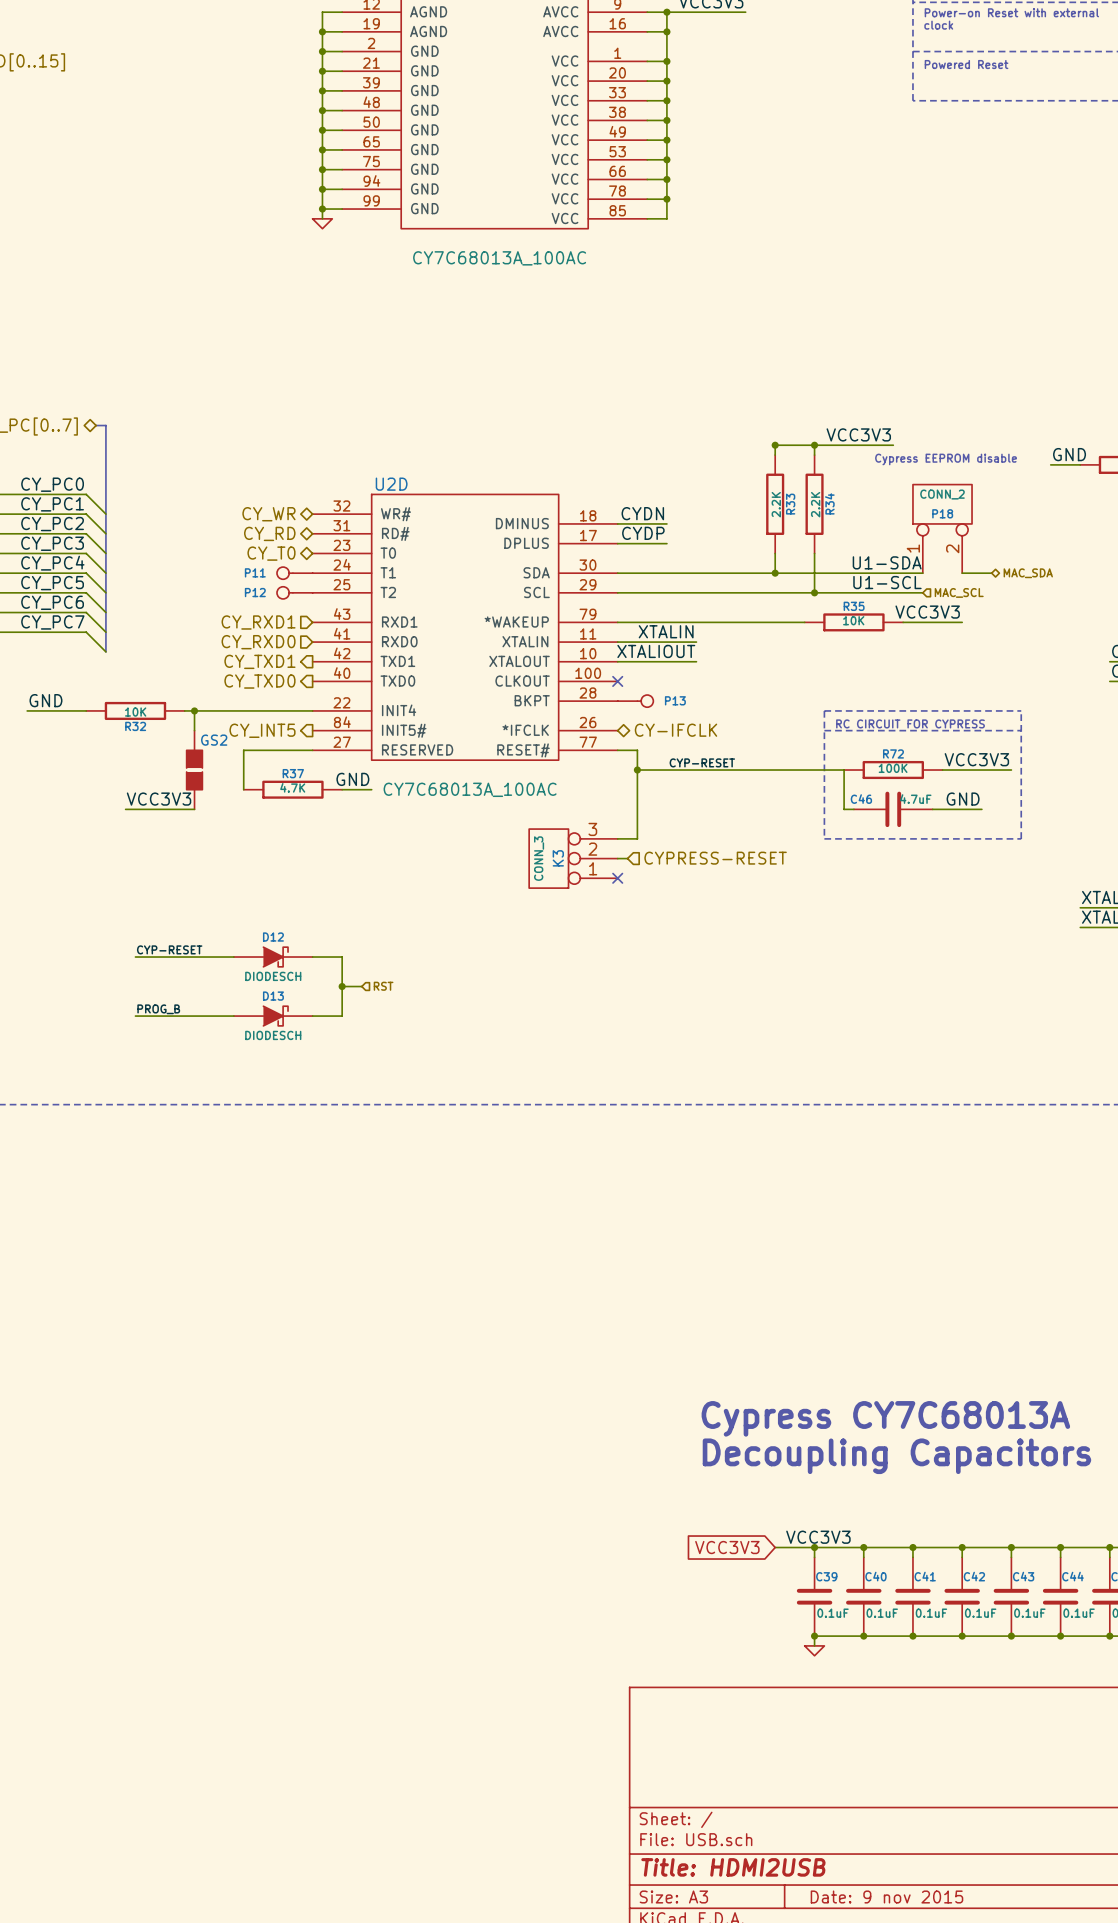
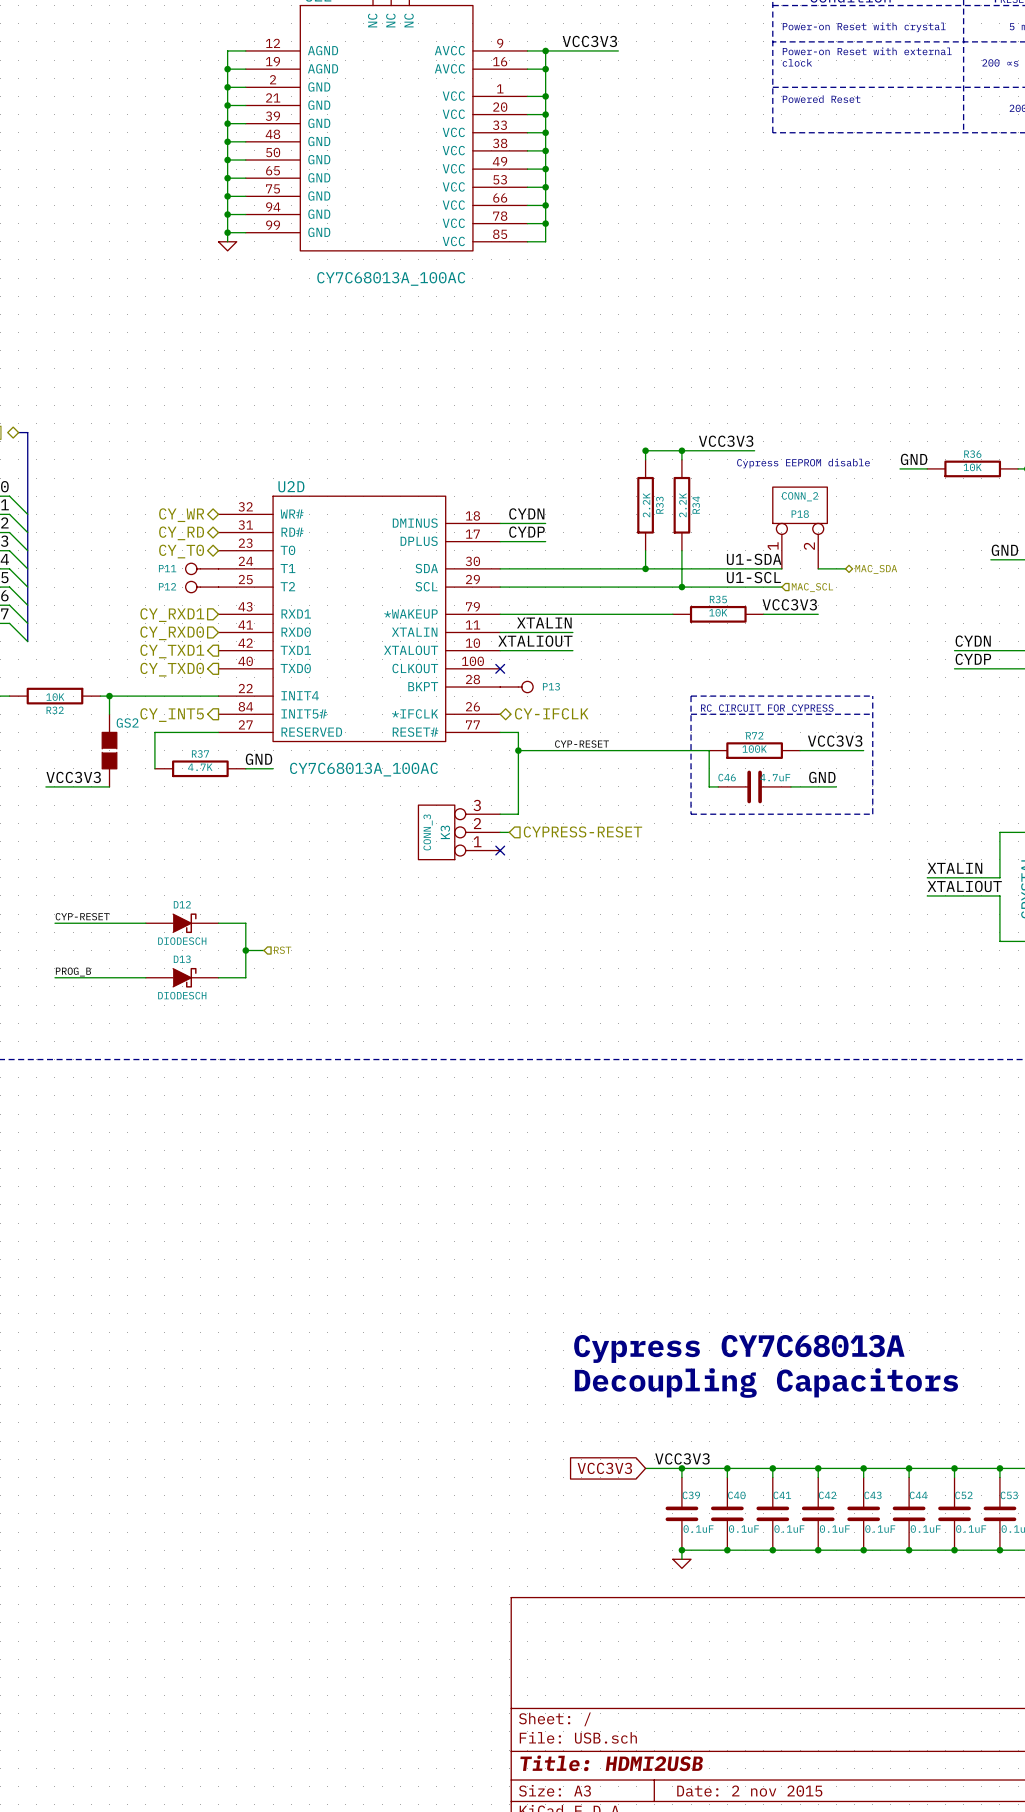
title block: Date: 9 nov 2015 (886, 1896) -> Date: 2 nov 2015 (749, 1791)

